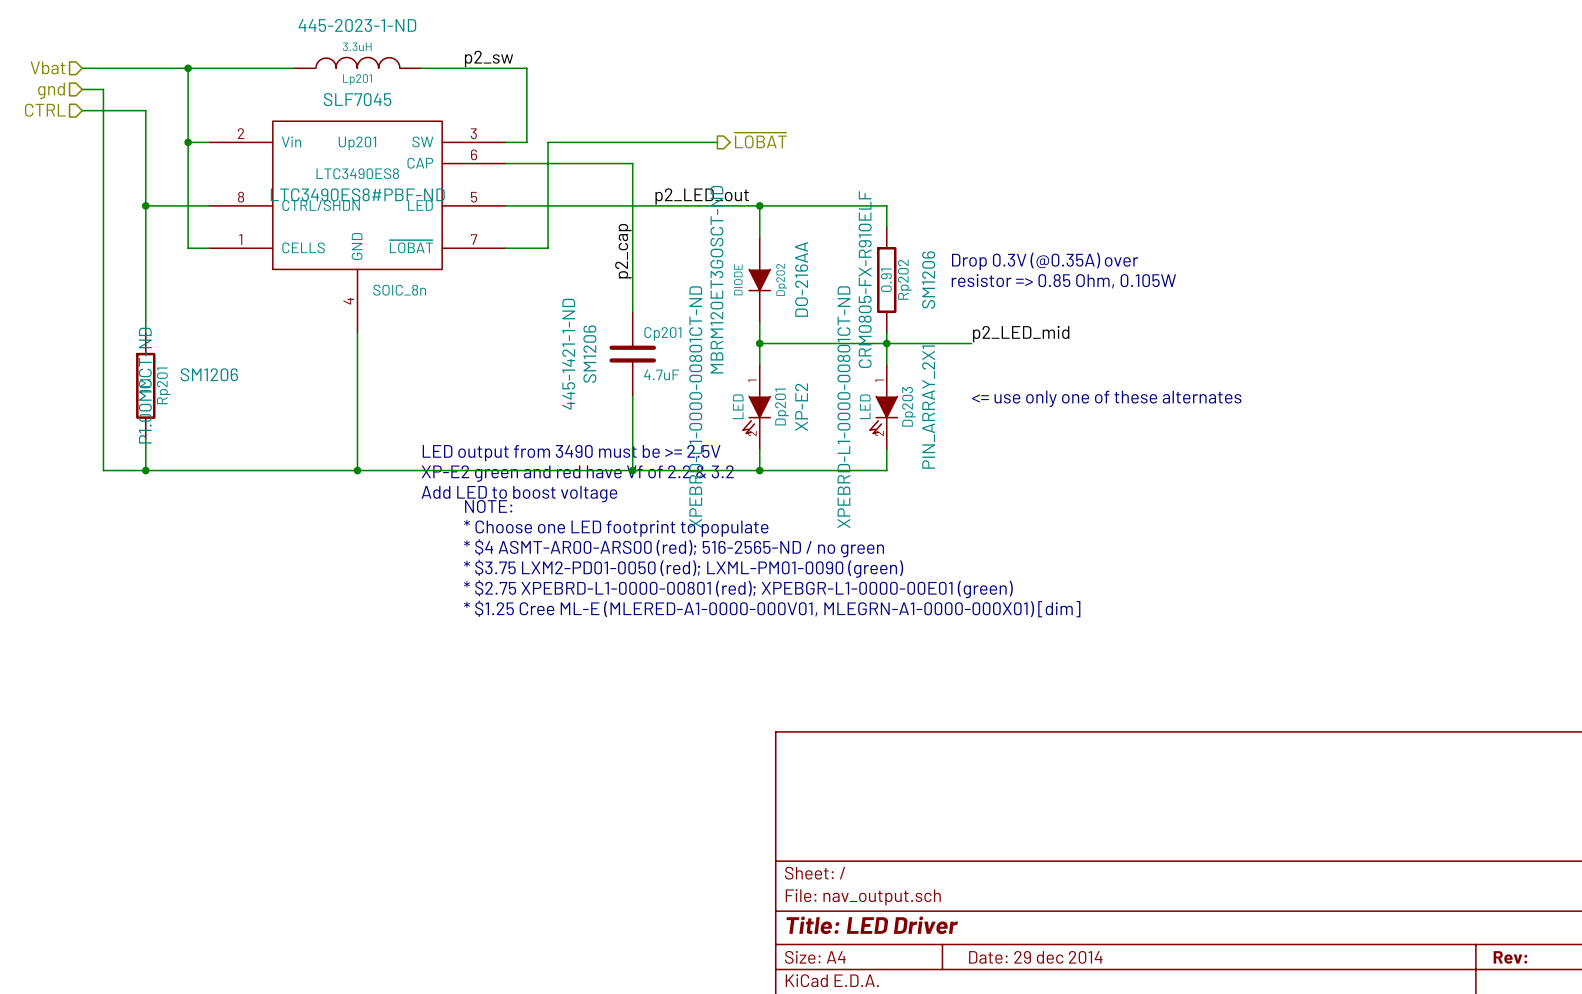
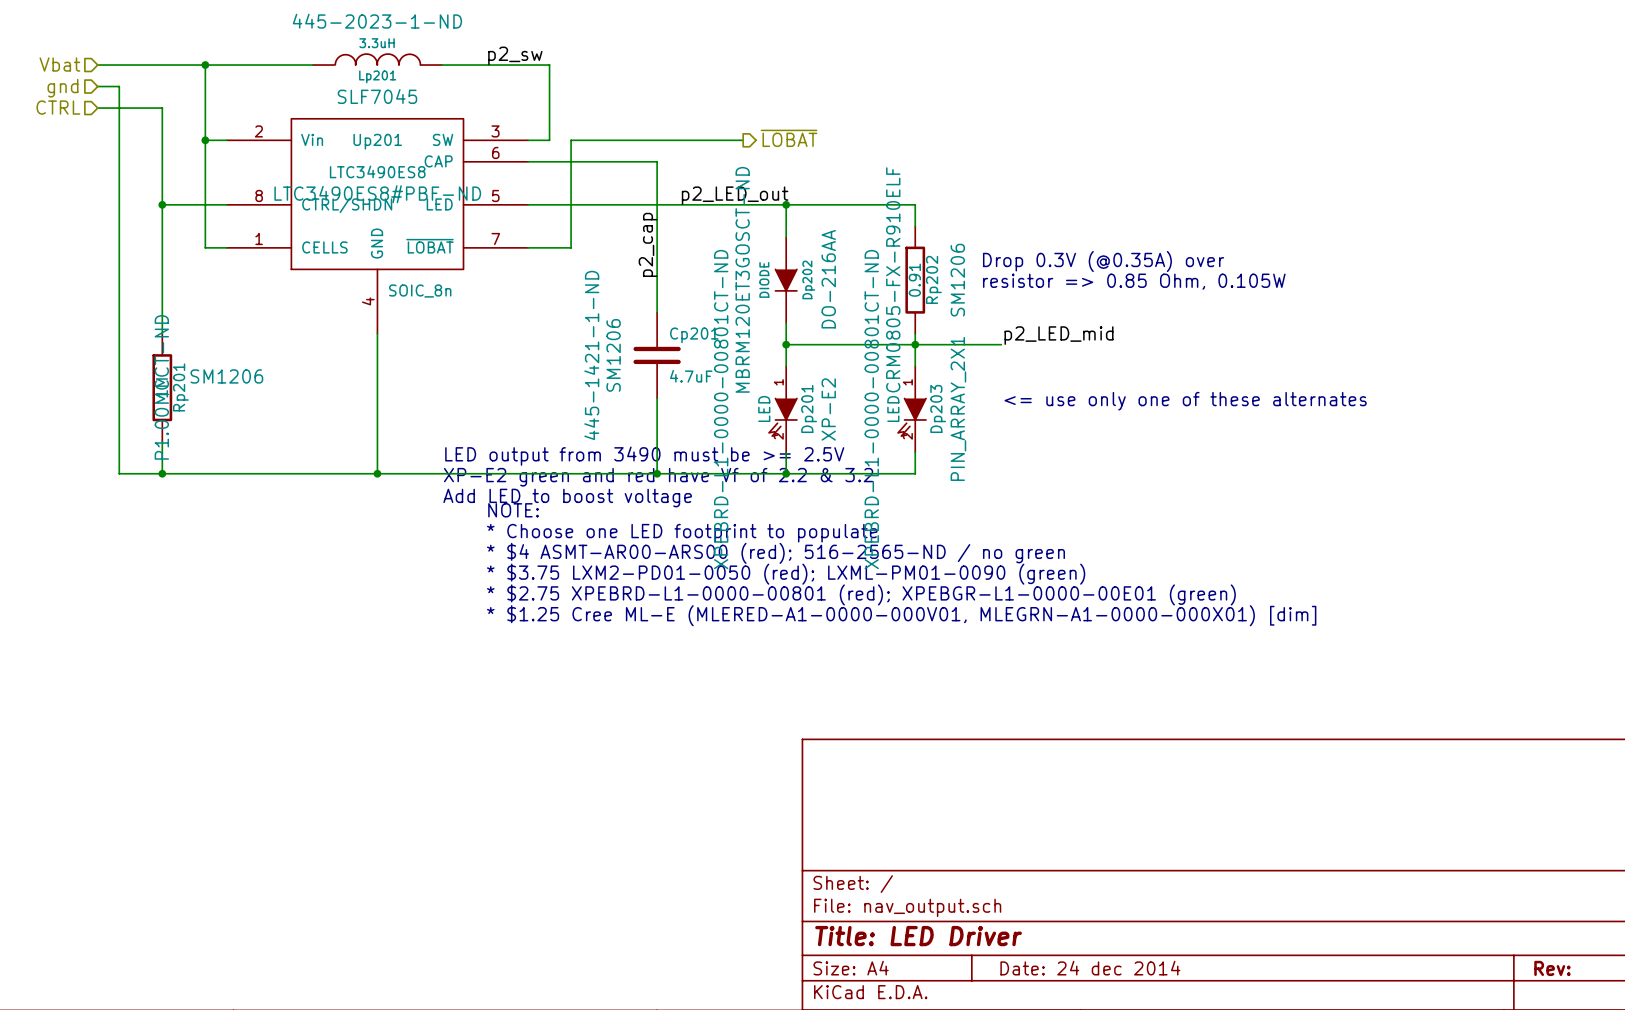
title block: Date: 29 dec 2014 (1035, 957) -> Date: 24 dec 2014 (1090, 968)

